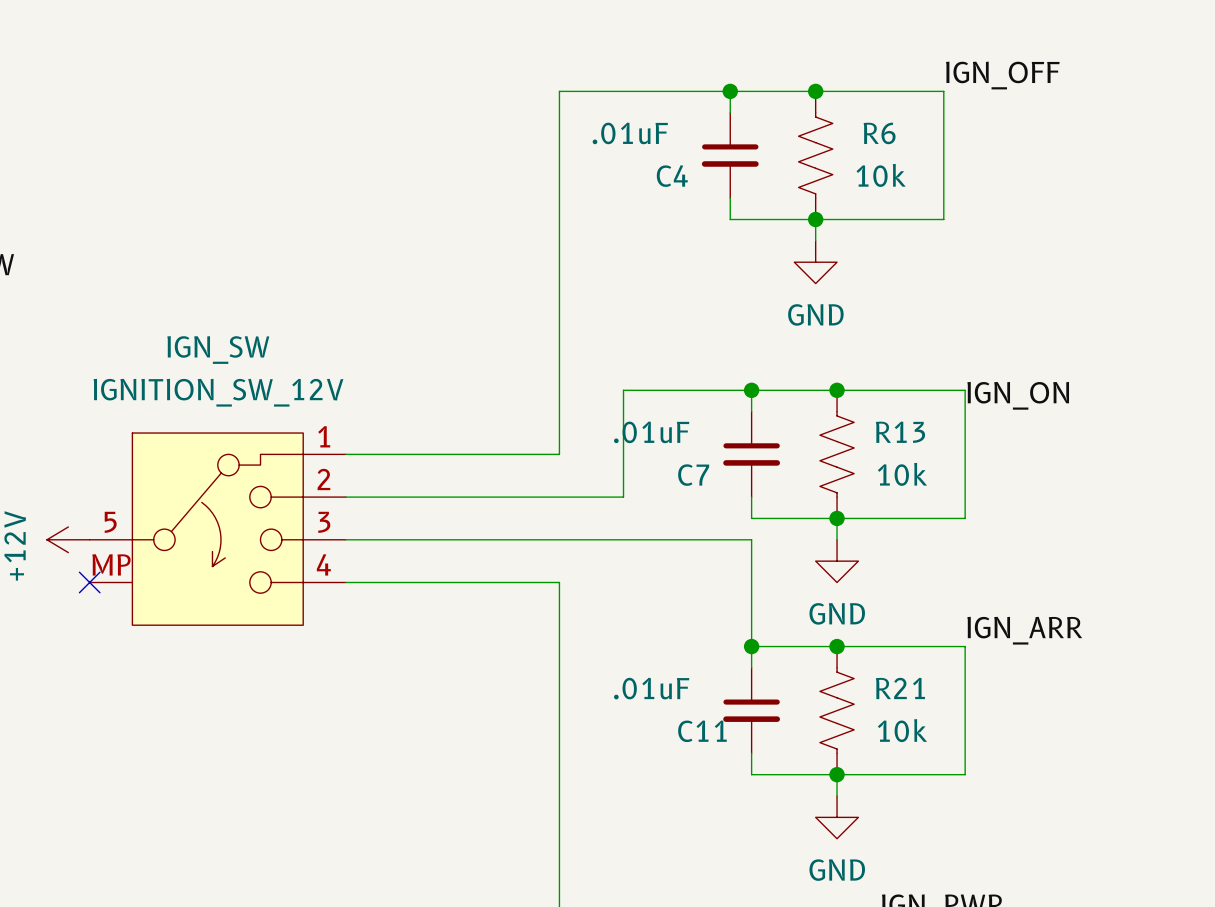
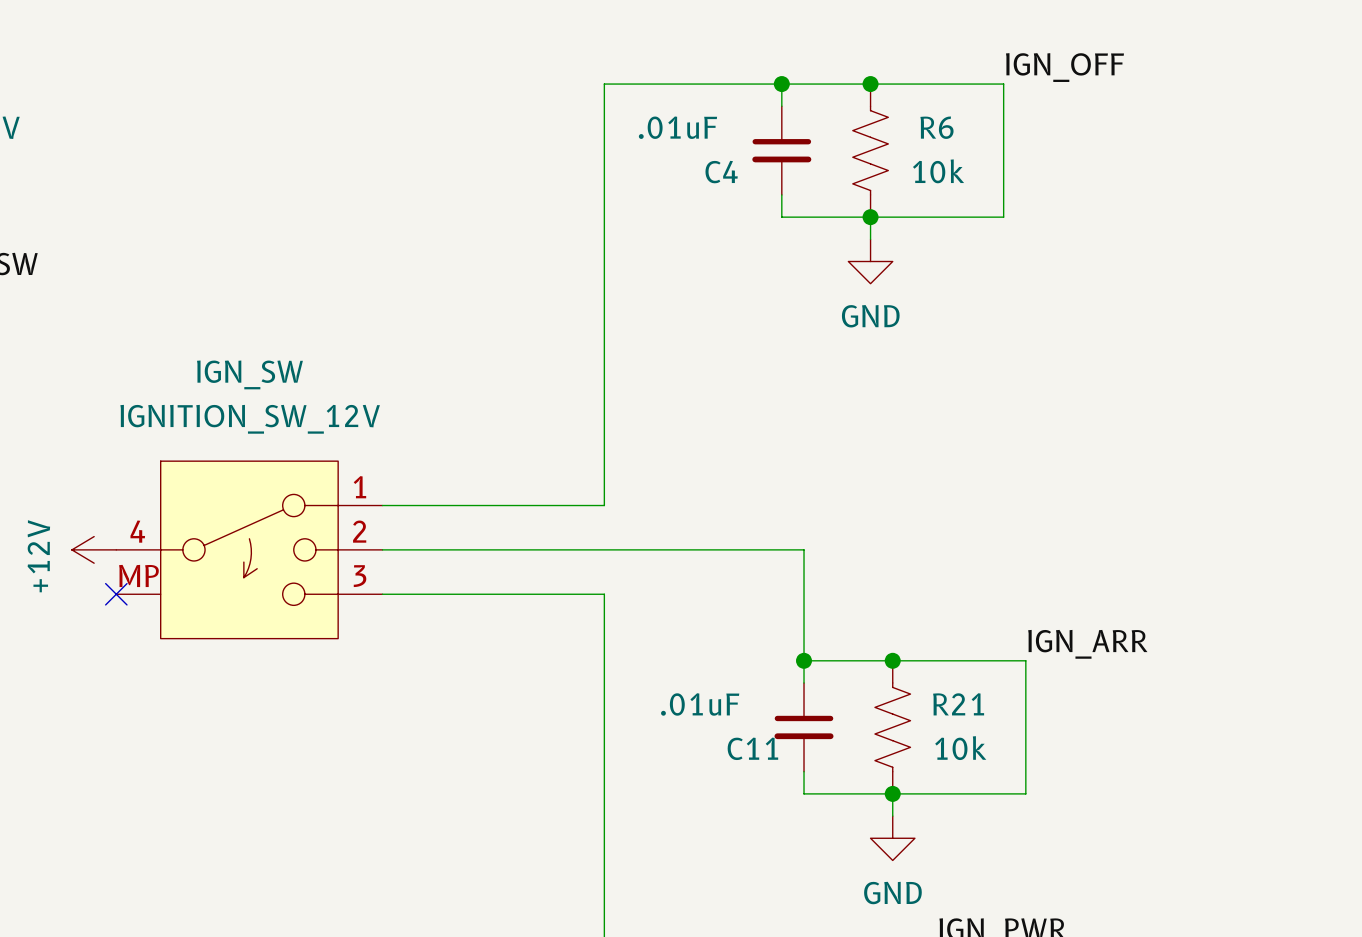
wire: (751, 390) (751, 411) -> none
junction: (751, 390) -> none
junction: (837, 390) -> none
label: IGN_ON (1018, 395) -> none
IGN_SW symbol: [89, 433, 346, 626] -> [116, 461, 383, 639]
wire: (345, 454) (559, 454) -> none
C7: .01uF (751, 454) -> none
R13: 10k (837, 454) -> none
wire: (559, 497) (623, 497) (623, 390) (965, 390) (965, 518) (751, 518) (751, 497) -> (604, 505) (604, 461)
wire: (837, 518) (837, 539) -> none
junction: (837, 518) -> none
power symbol: GND (837, 561) -> none

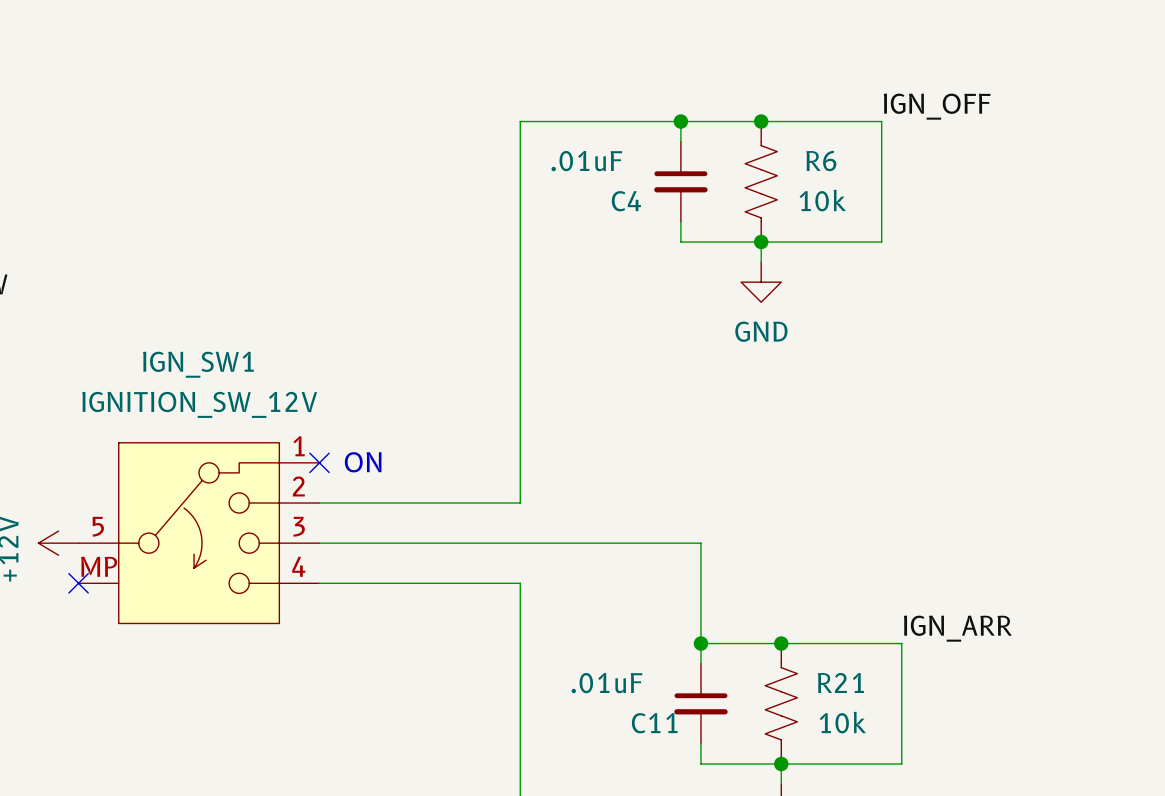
text: none -> ON (363, 462)
no-connect mark: none -> (319, 462)
IGN_SW1: none -> IGNITION_SW_12V (199, 533)
IGN_SW: IGNITION_SW_12V (249, 549) -> none

